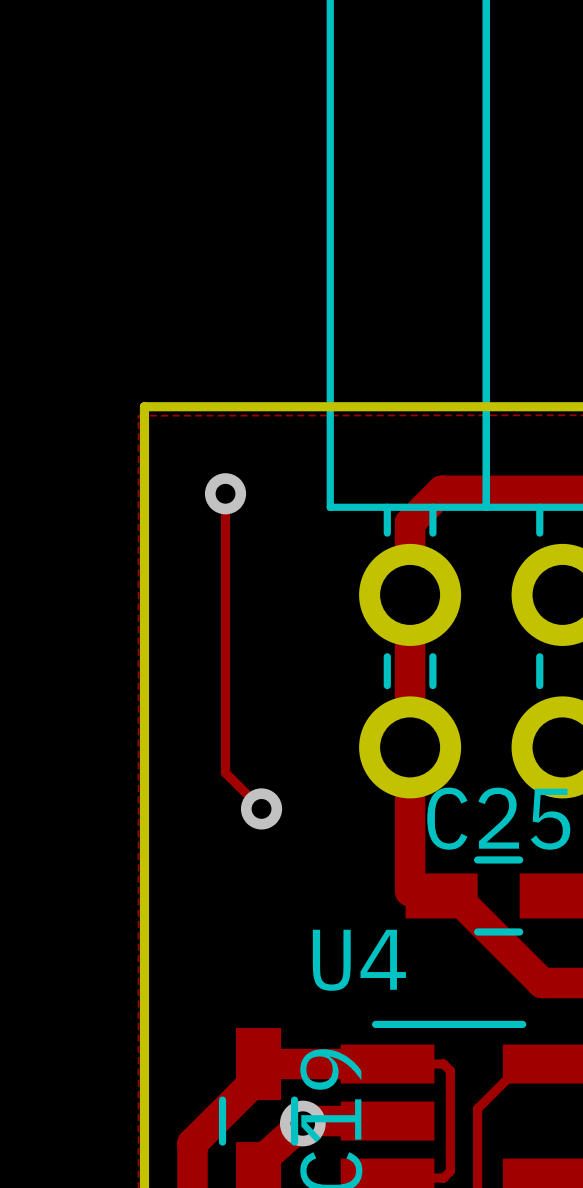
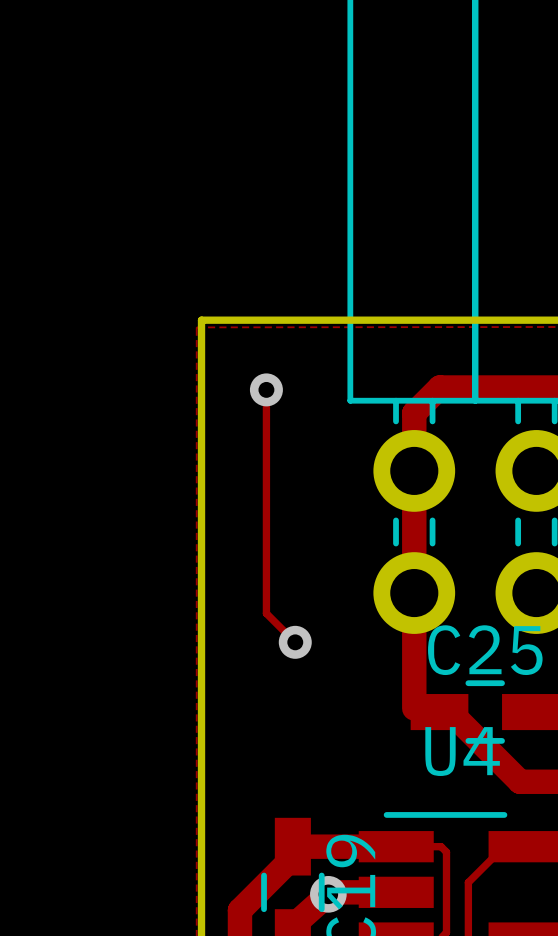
U4 name position: U4 (359, 960) -> U4 (462, 751)

